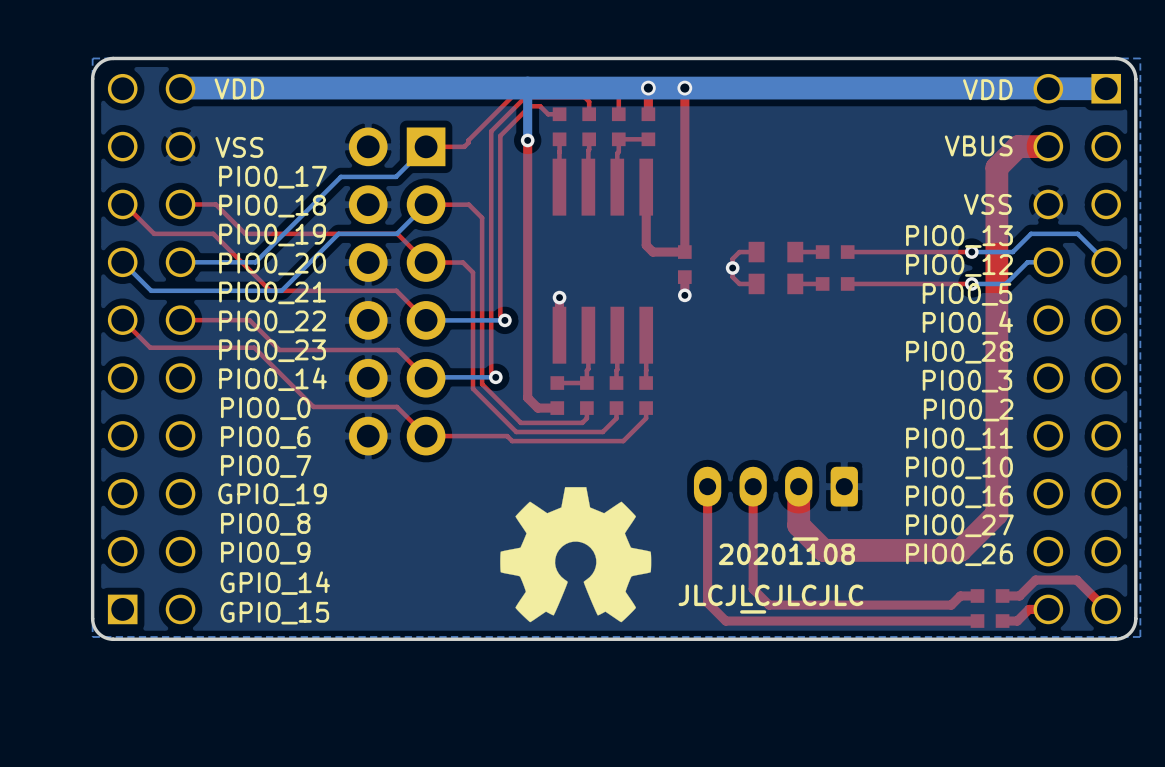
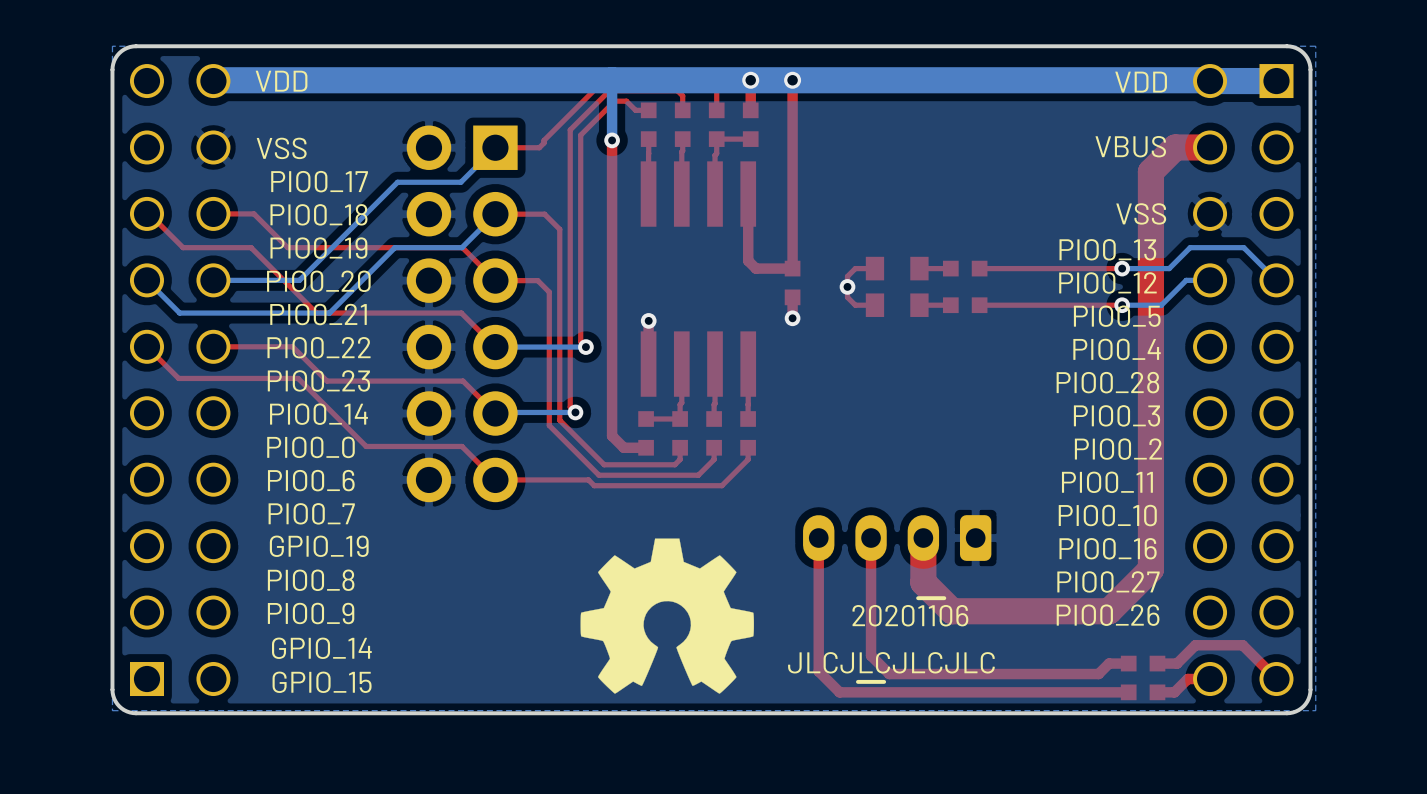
drawing shape: [718, 537, 855, 566] -> [852, 596, 969, 627]

